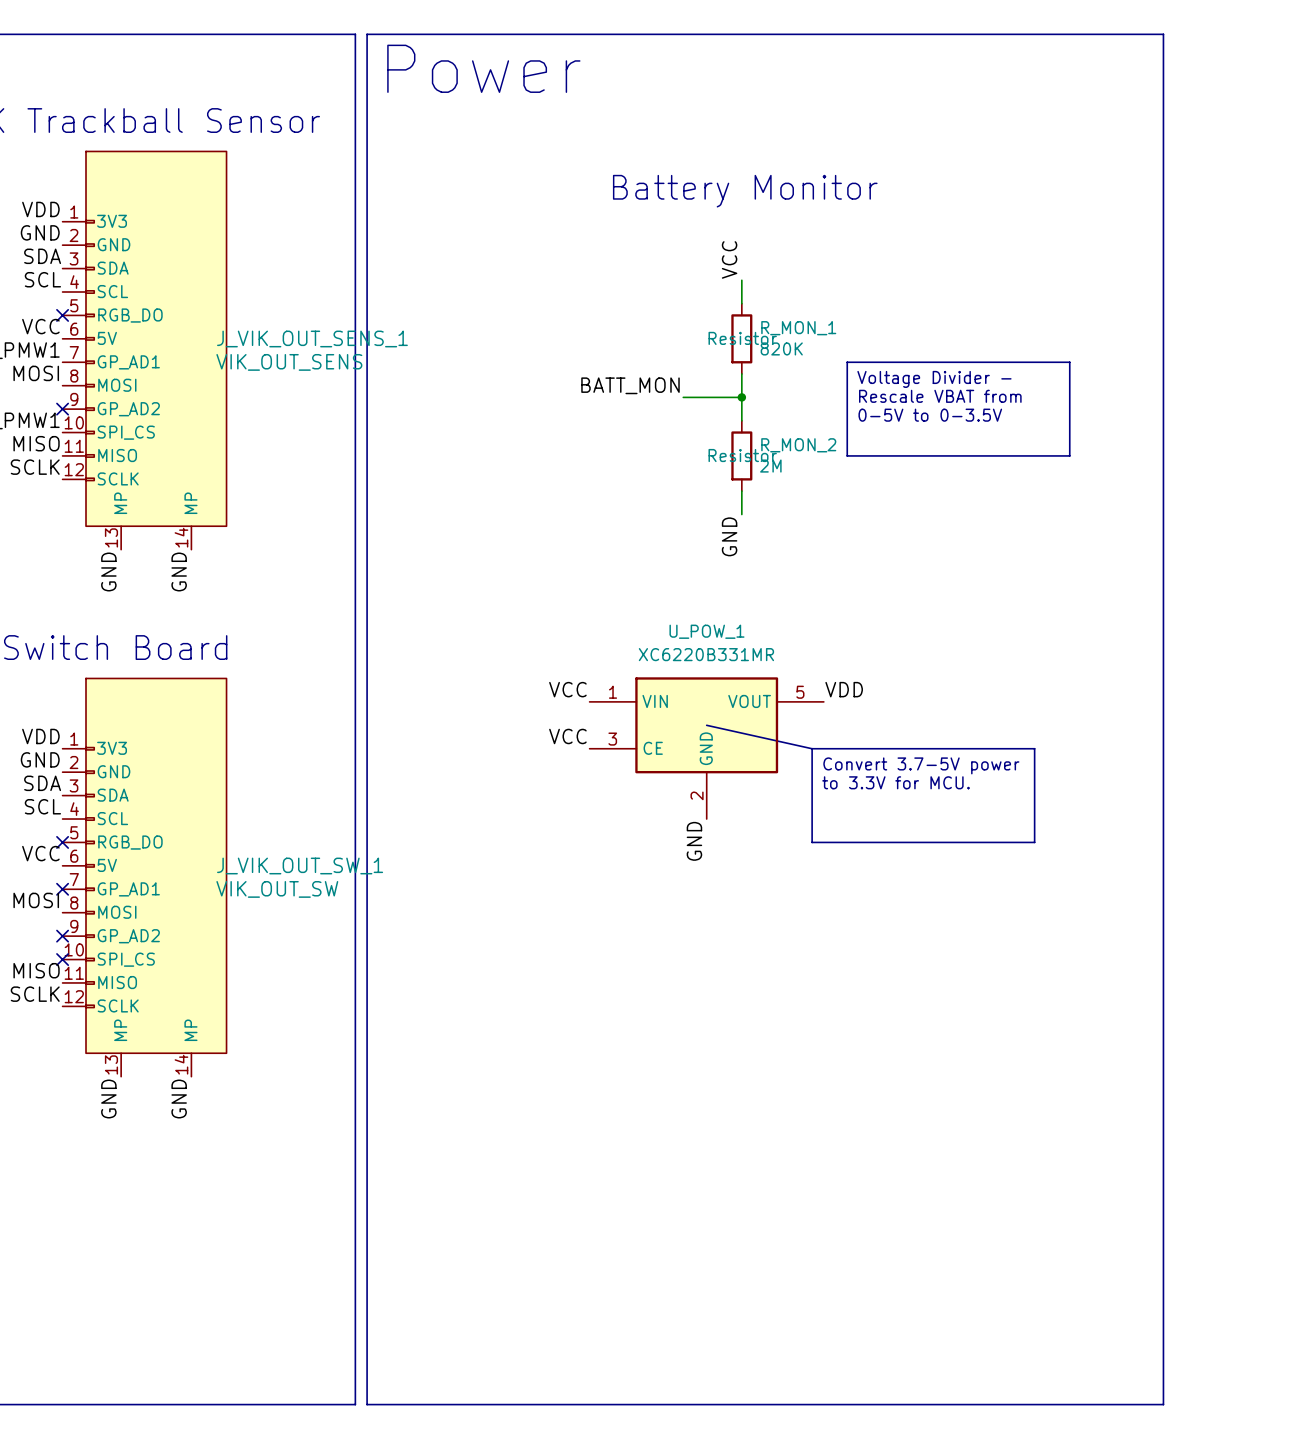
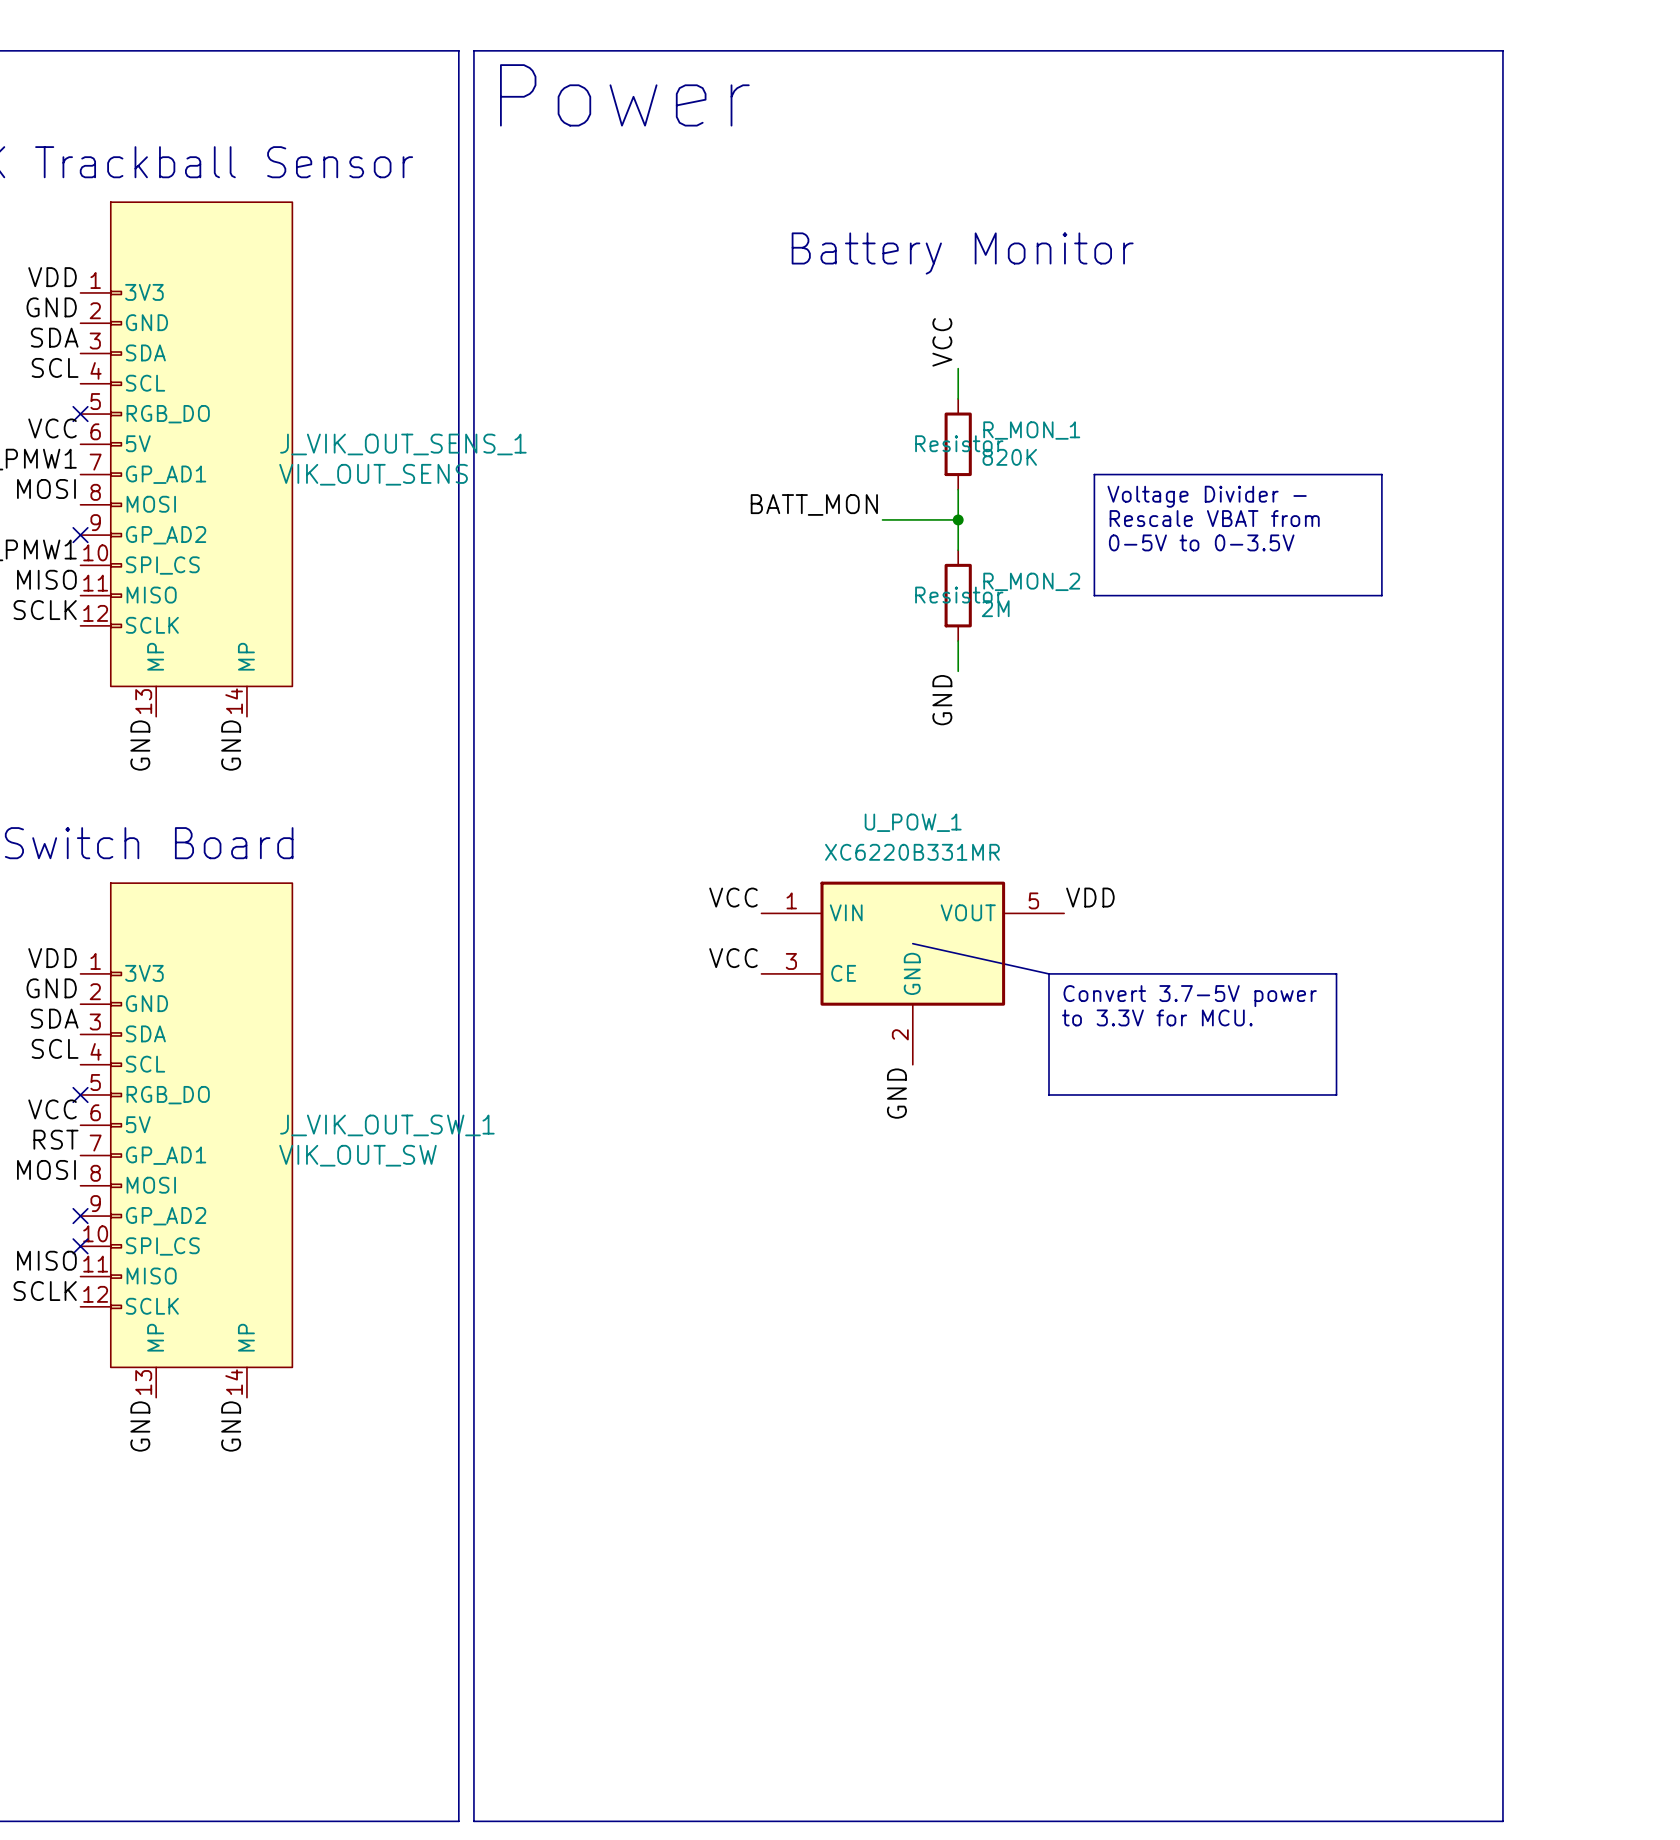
label: none -> RST (55, 1139)
no-connect mark: (62, 889) -> none

